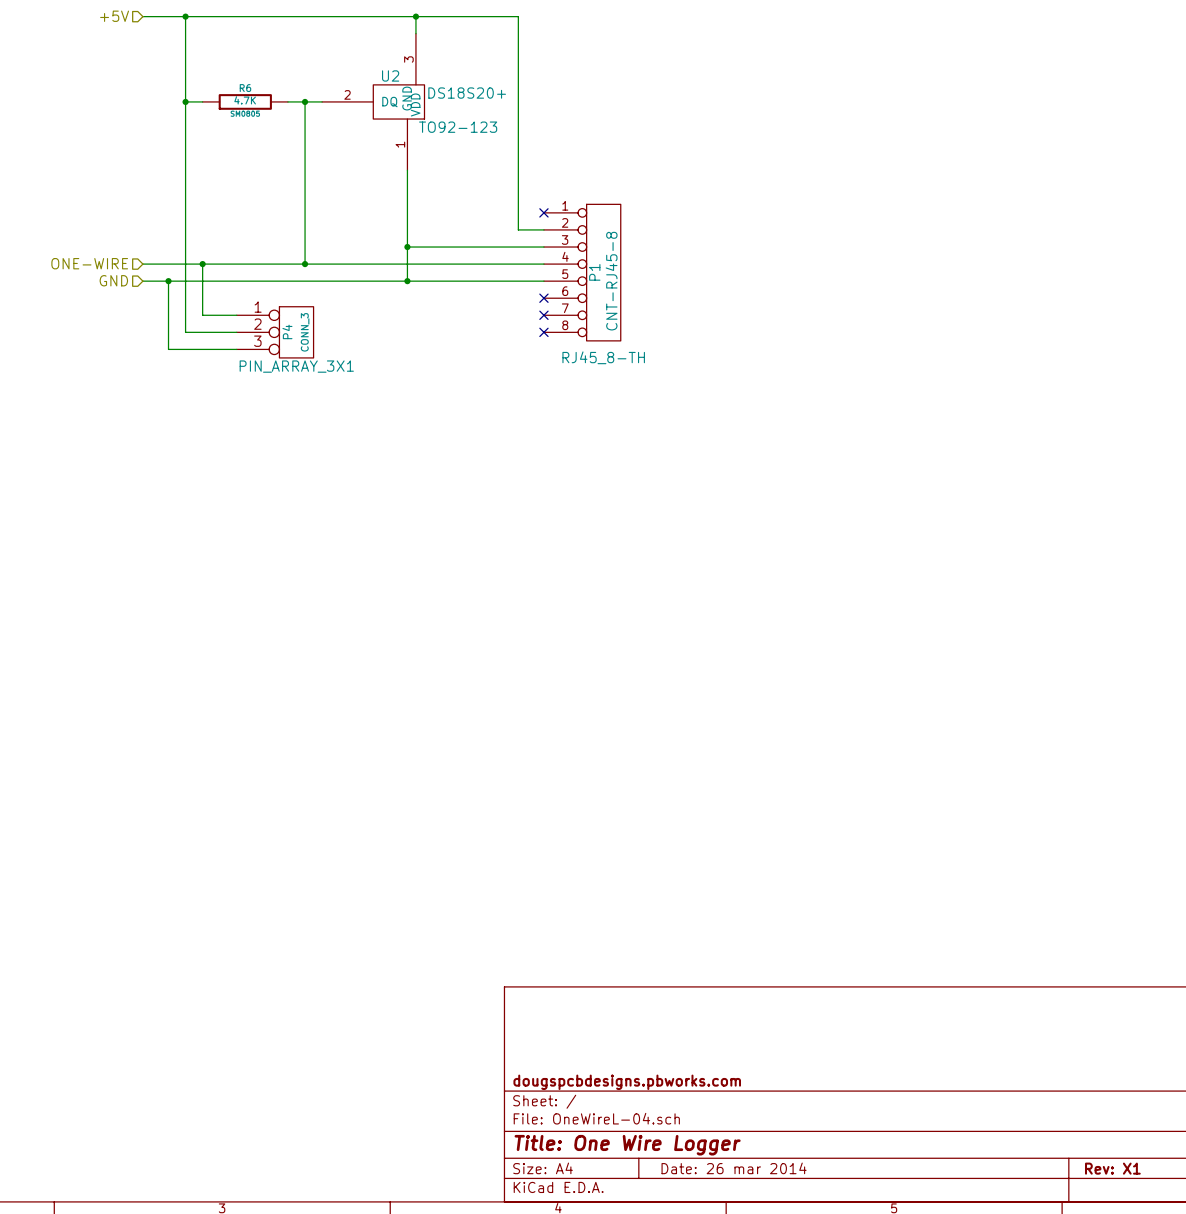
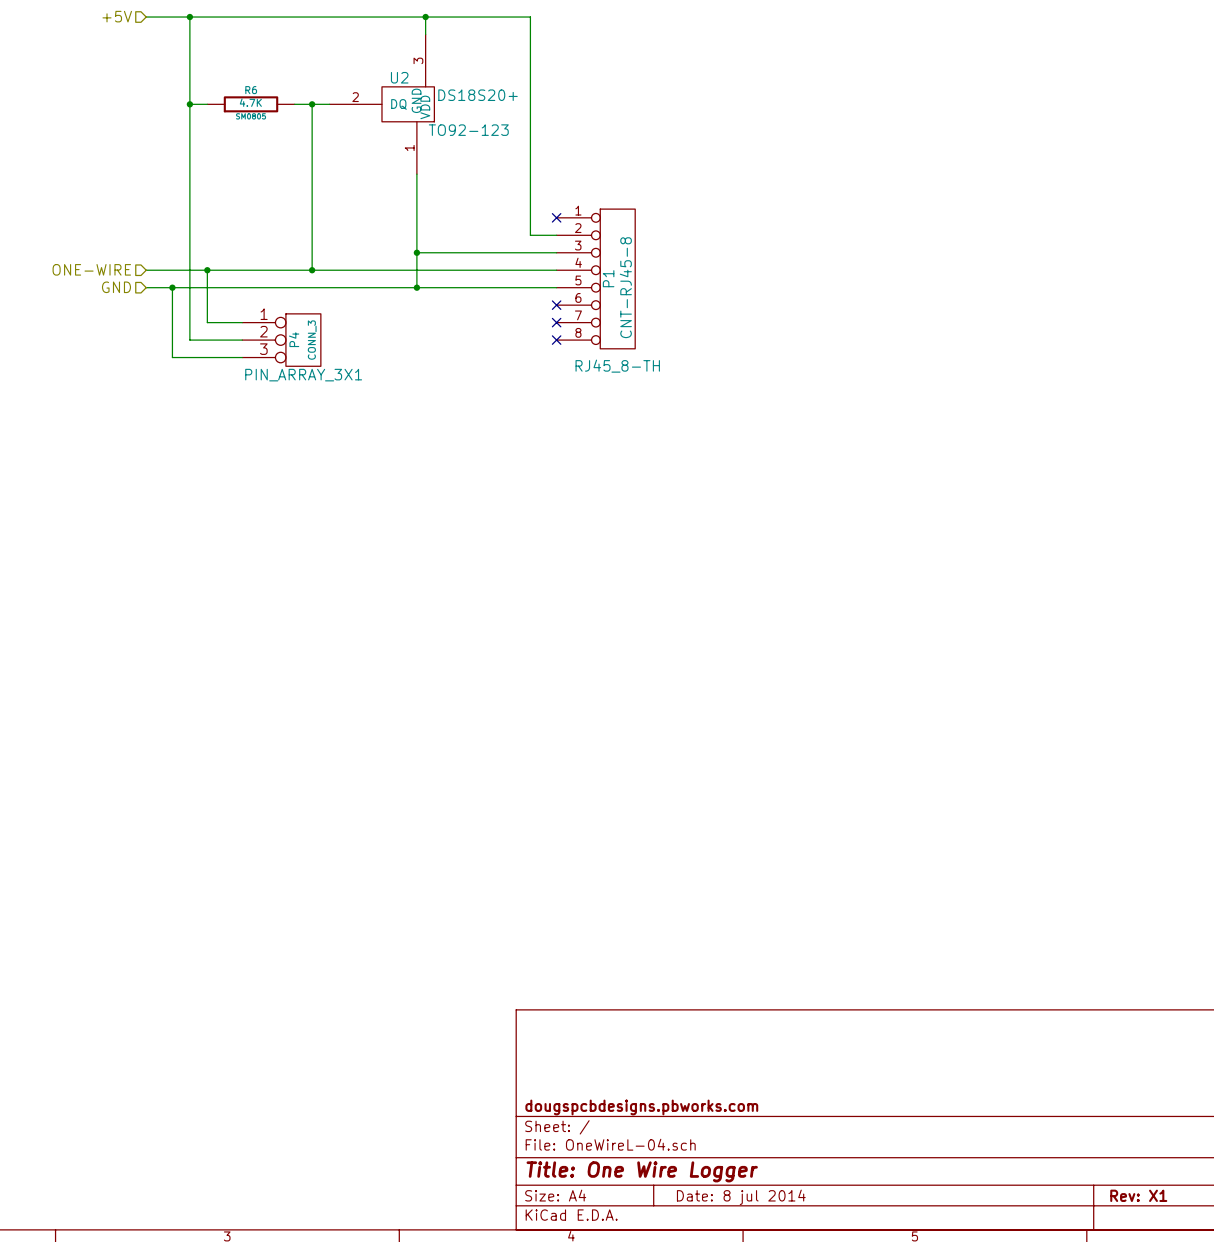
title block: Date: 26 mar 2014 (734, 1168) -> Date: 8 jul 2014 (741, 1197)

